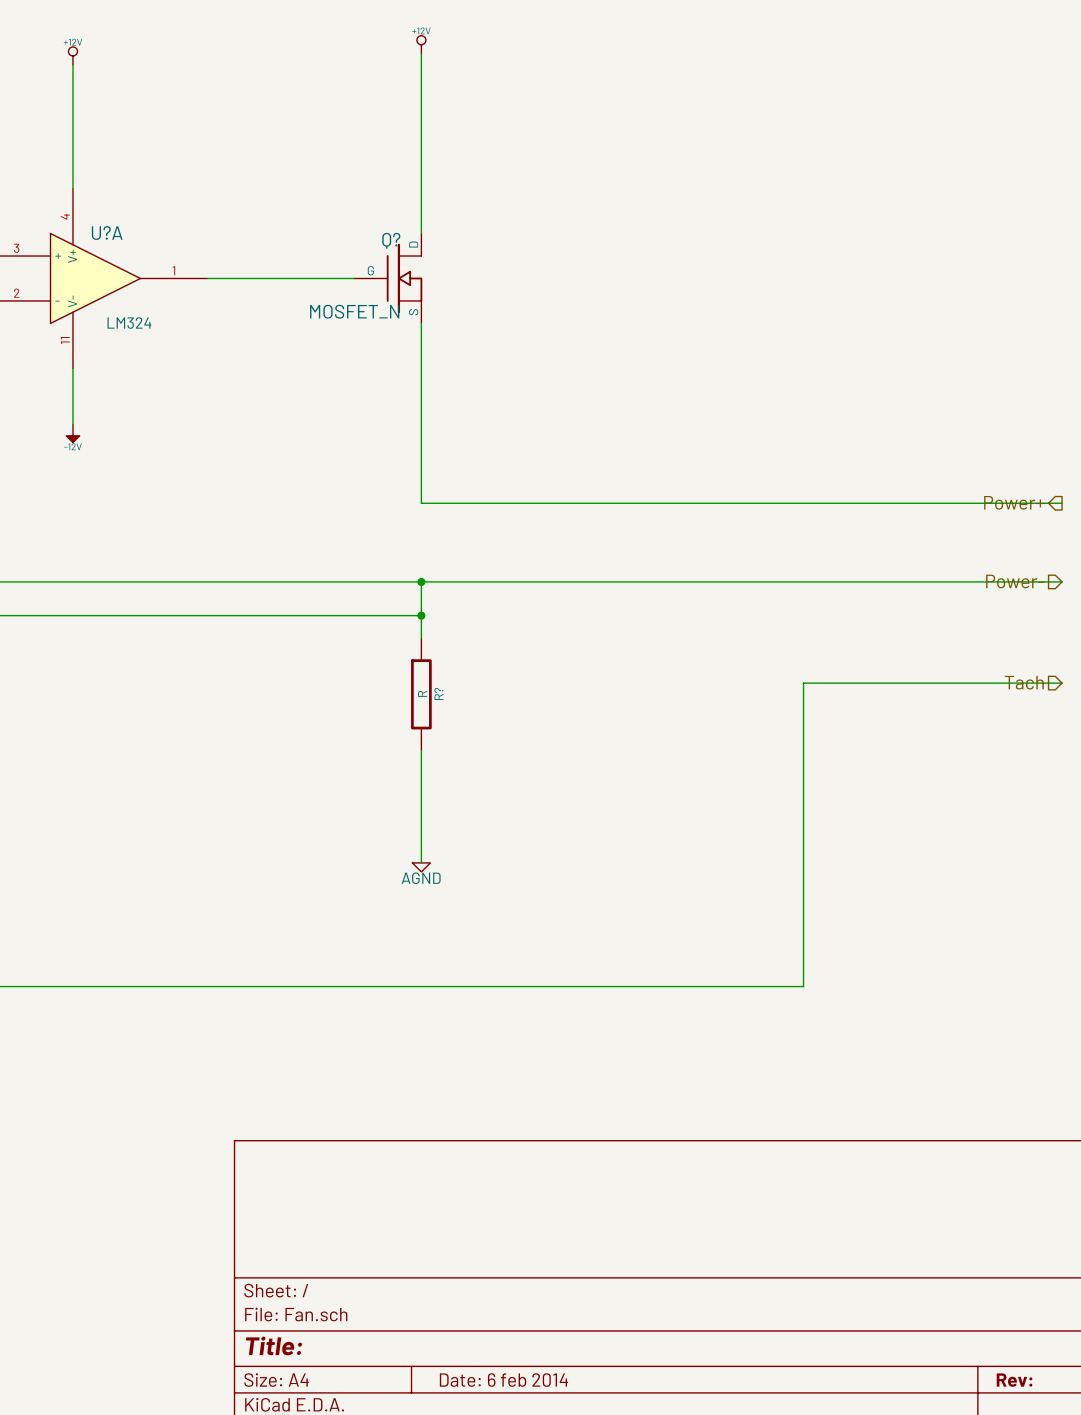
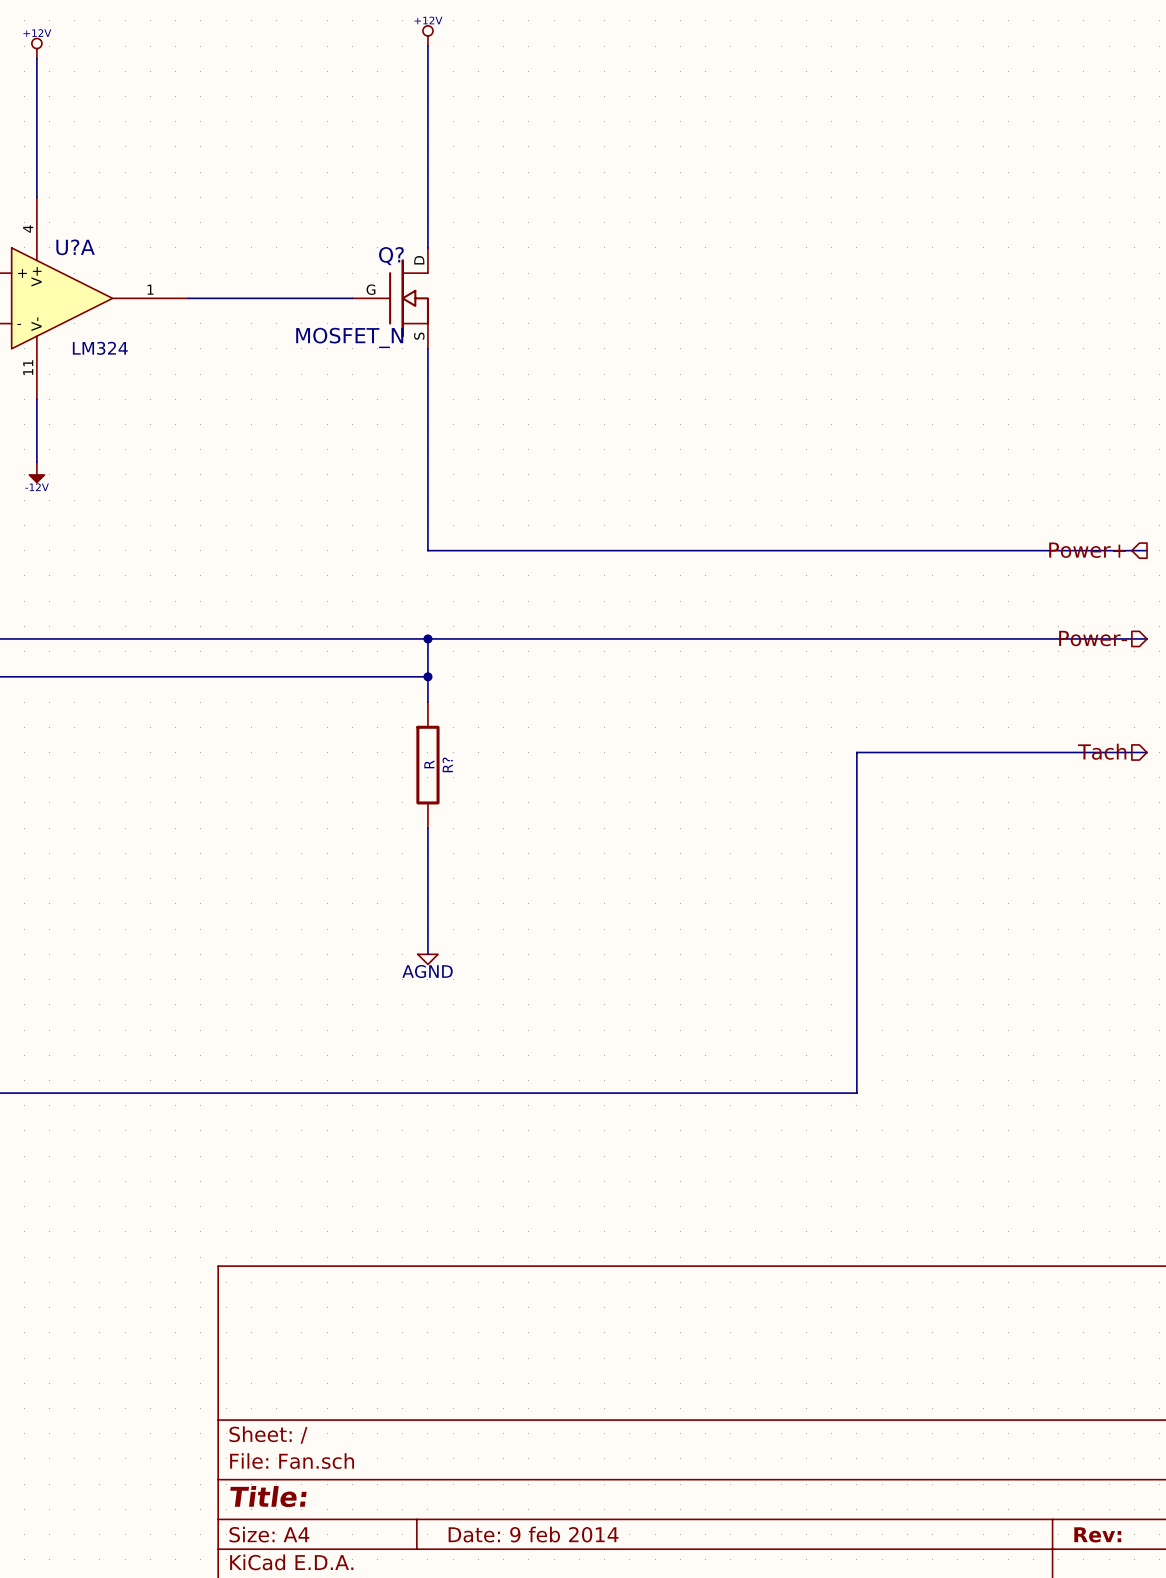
title block: Date: 6 feb 2014 (503, 1380) -> Date: 9 feb 2014 (533, 1534)

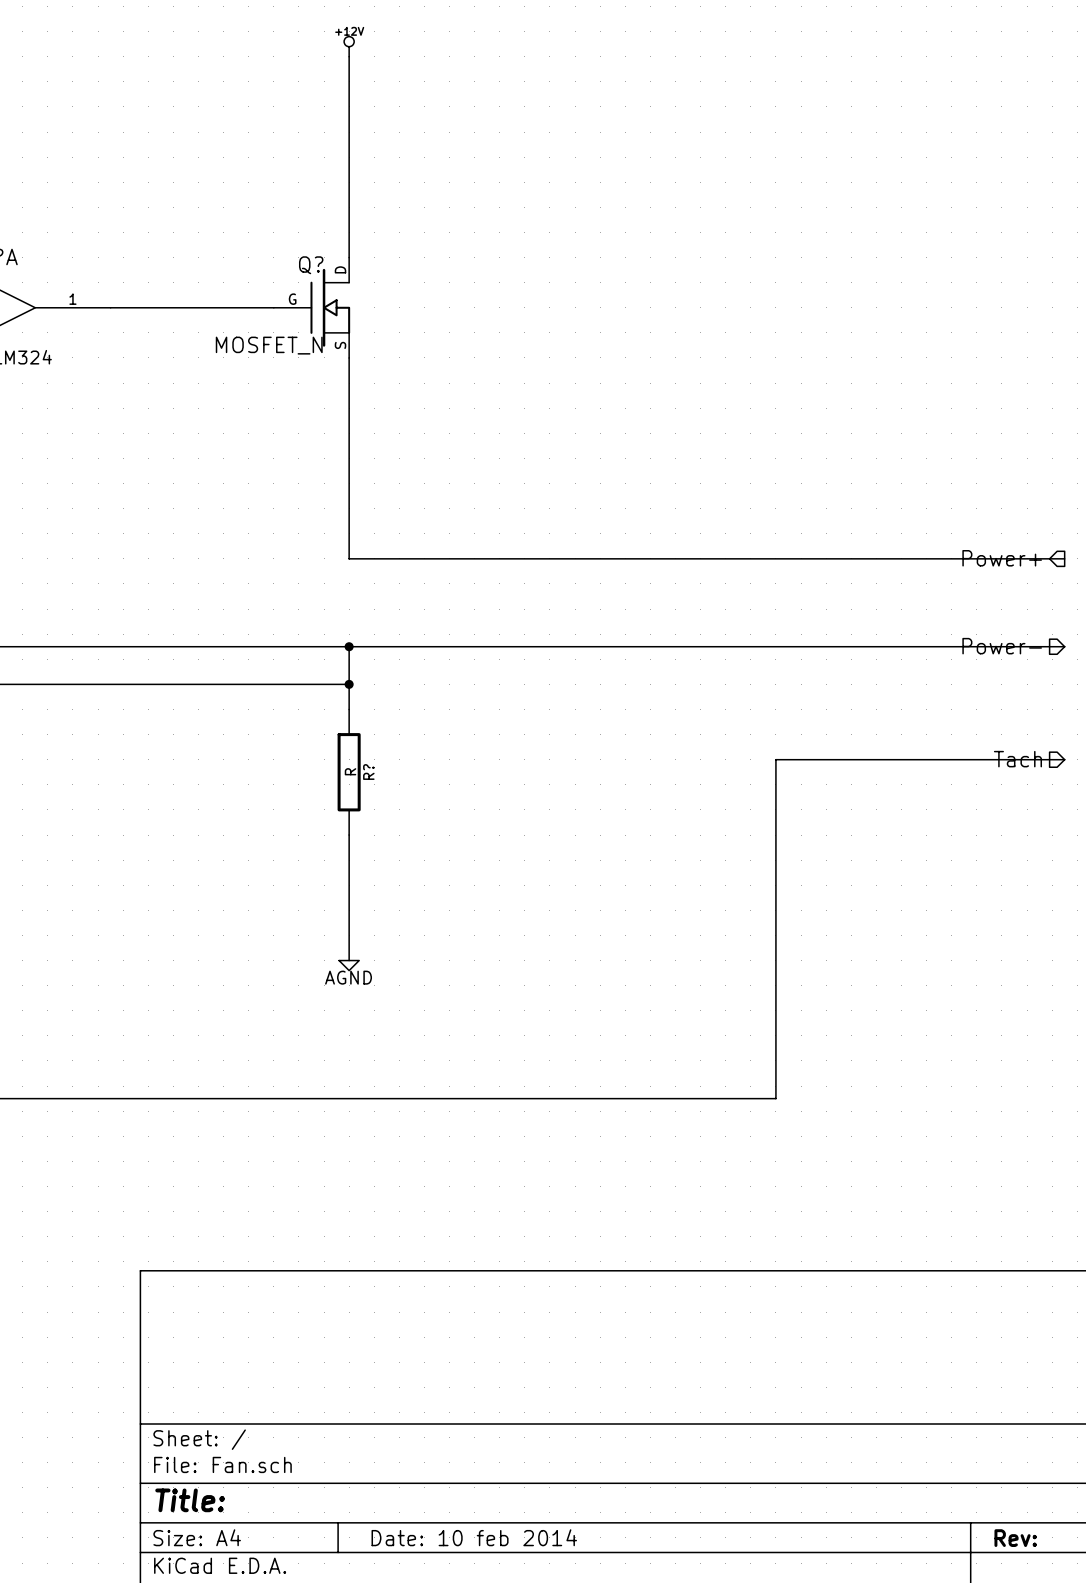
title block: Date: 9 feb 2014 (533, 1534) -> Date: 10 feb 2014 (474, 1537)

